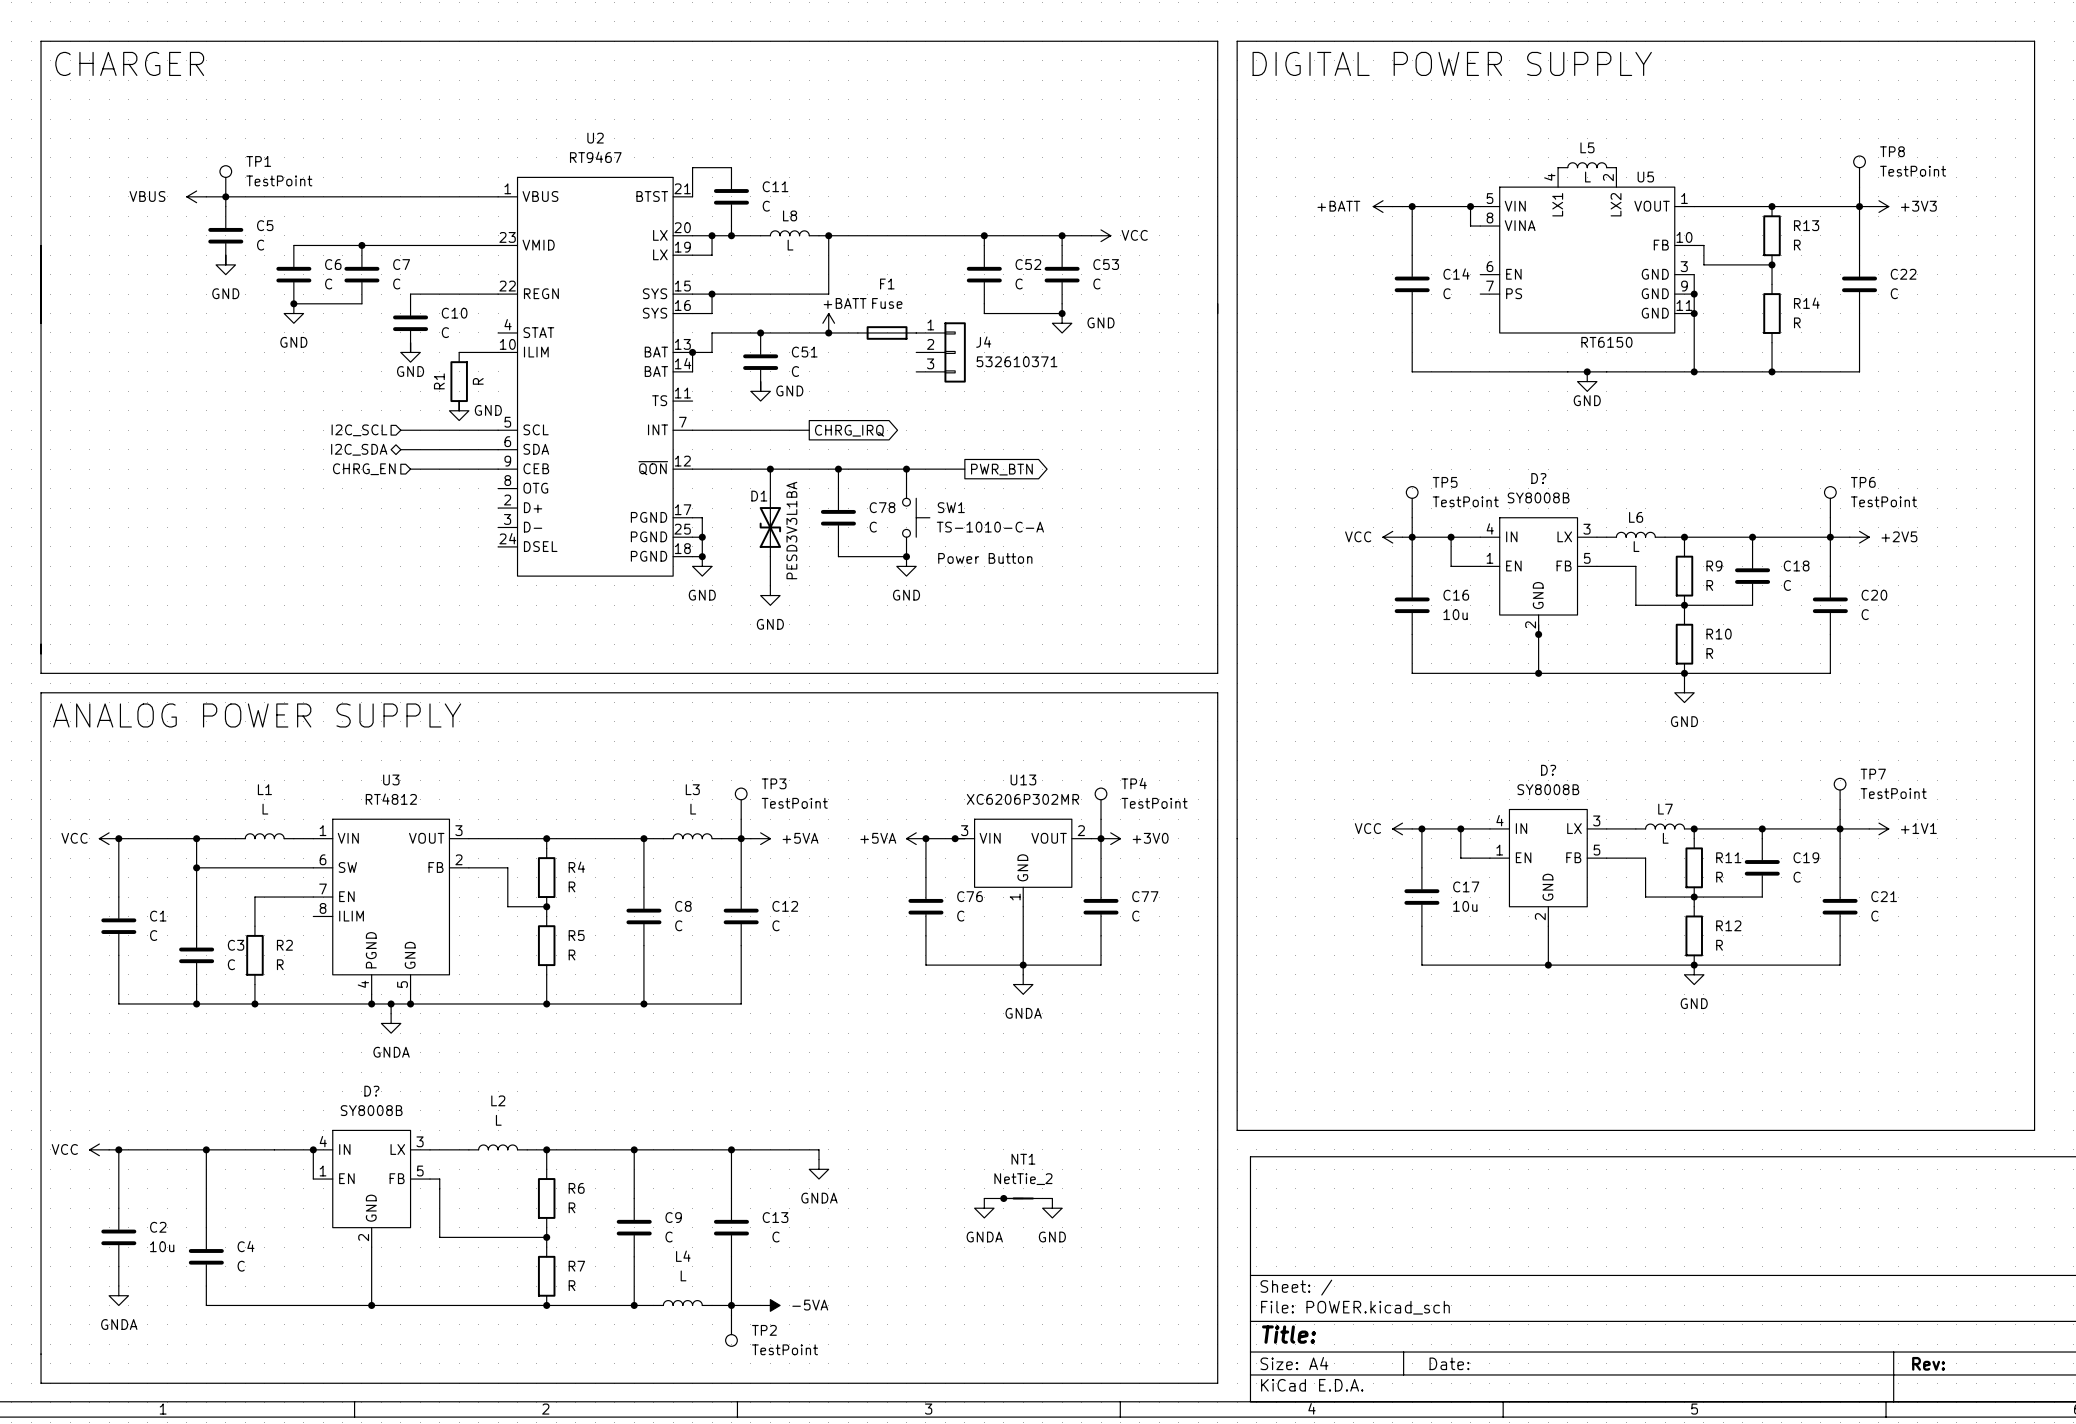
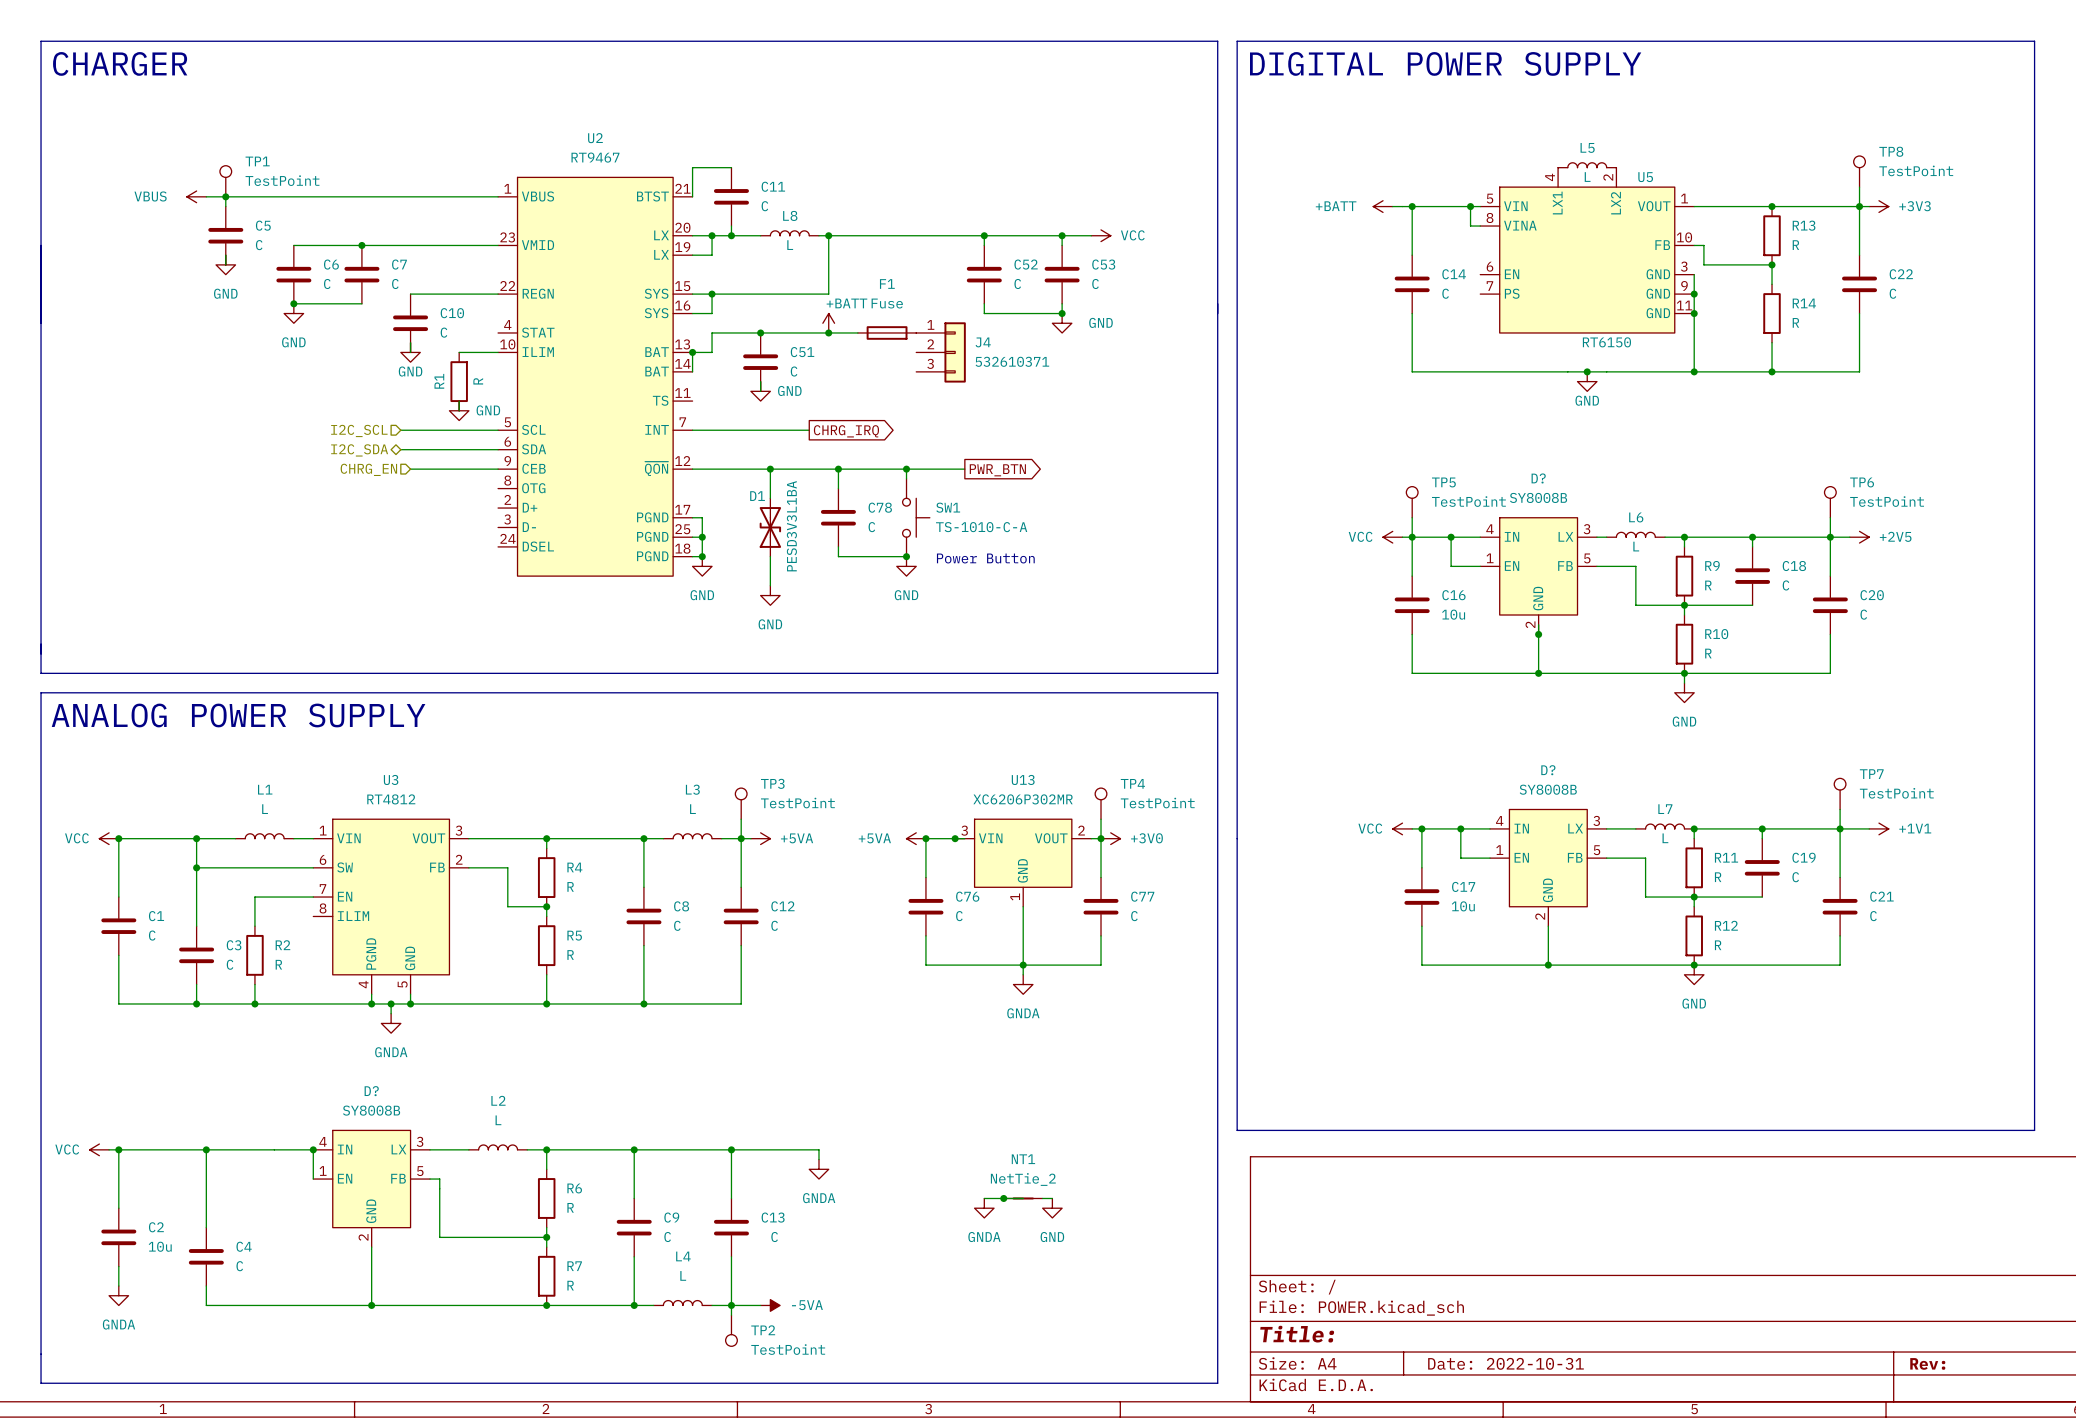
title block: Date: (1449, 1363) -> Date: 2022-10-31 (1505, 1363)

